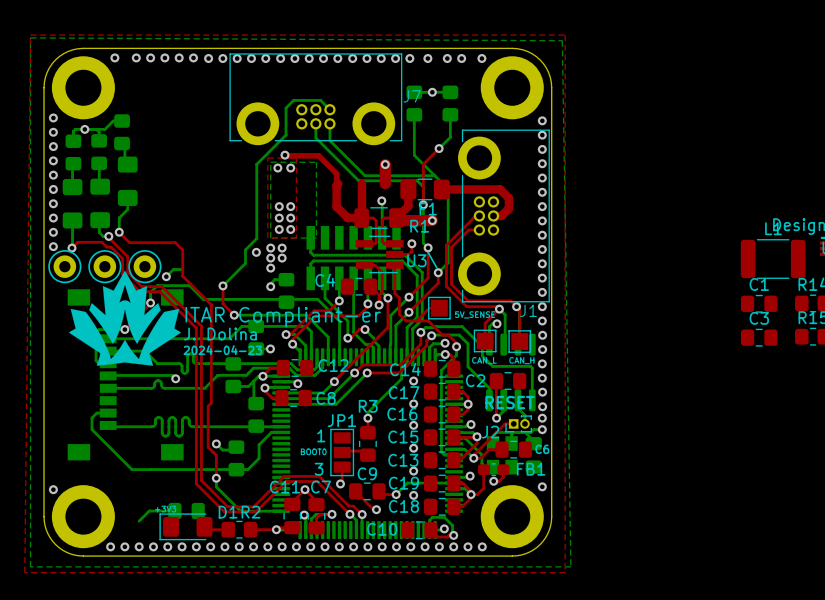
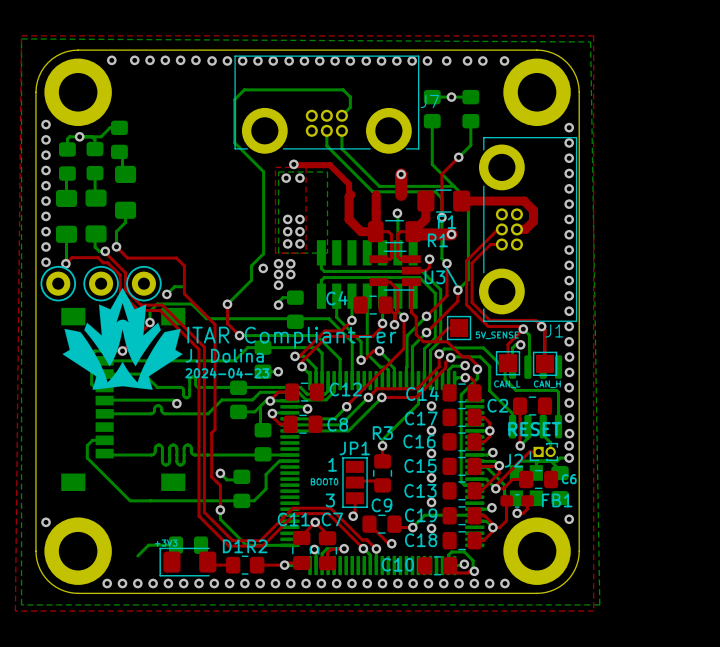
bottom track: (329, 109) (320, 100) (293, 100) (286, 108) (286, 135) (256, 164) -> (341, 115) (350, 107) (350, 97) (343, 89) (244, 89) (234, 99) (234, 142) (263, 171) (263, 174)

